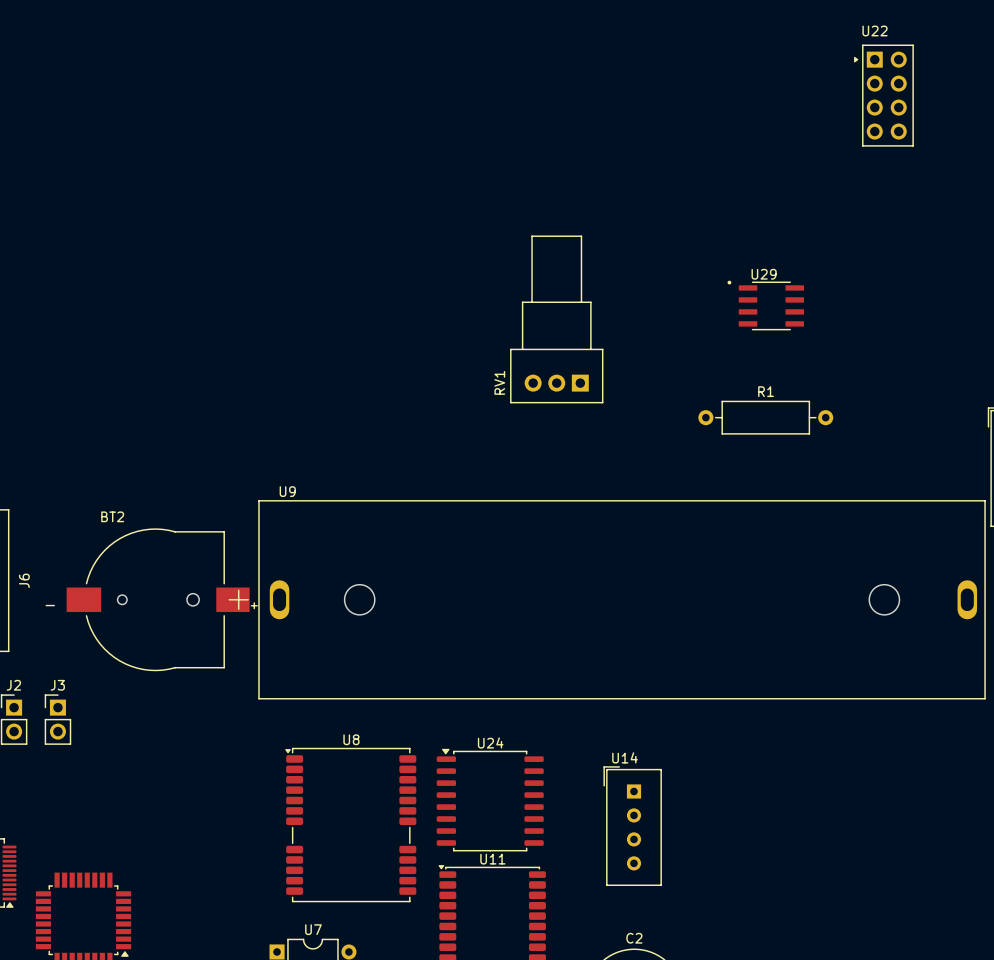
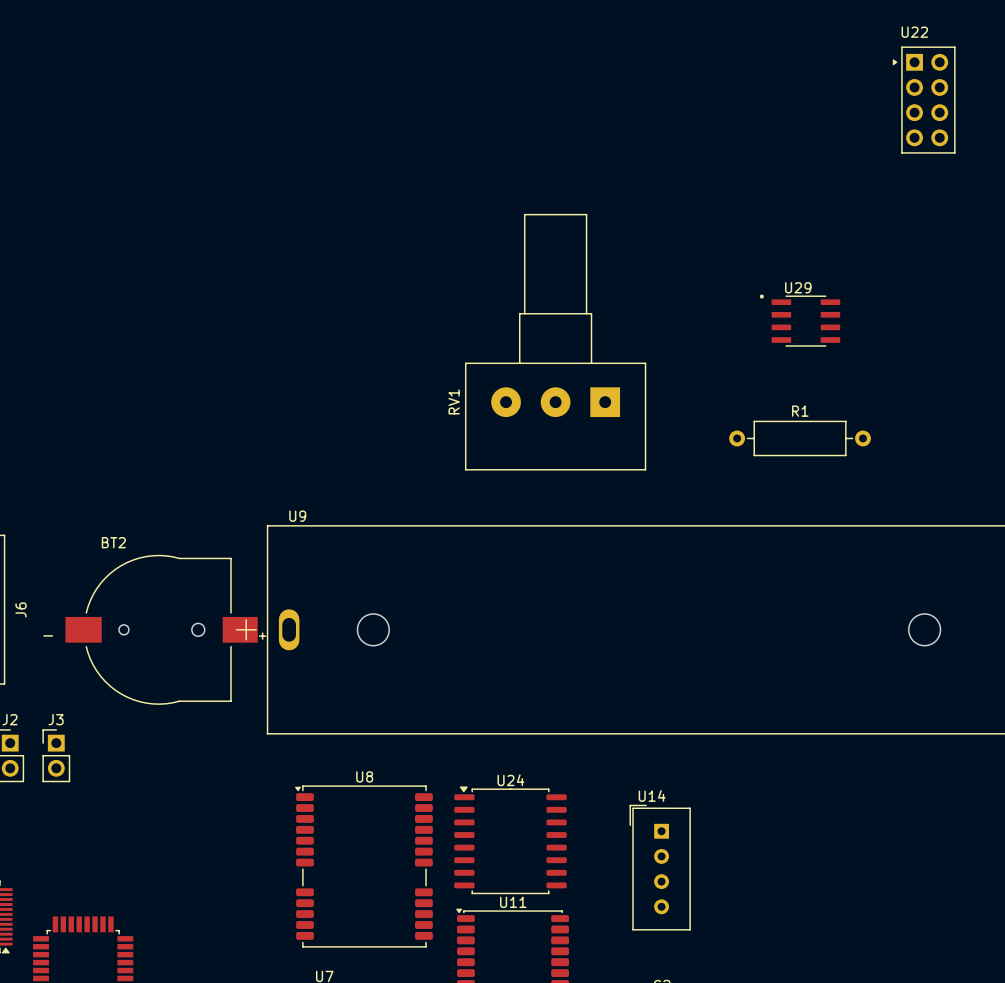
RV1 footprint: [510, 235, 604, 404] -> [465, 214, 647, 471]
RV1 name position: RV1 (499, 382) -> RV1 (454, 401)

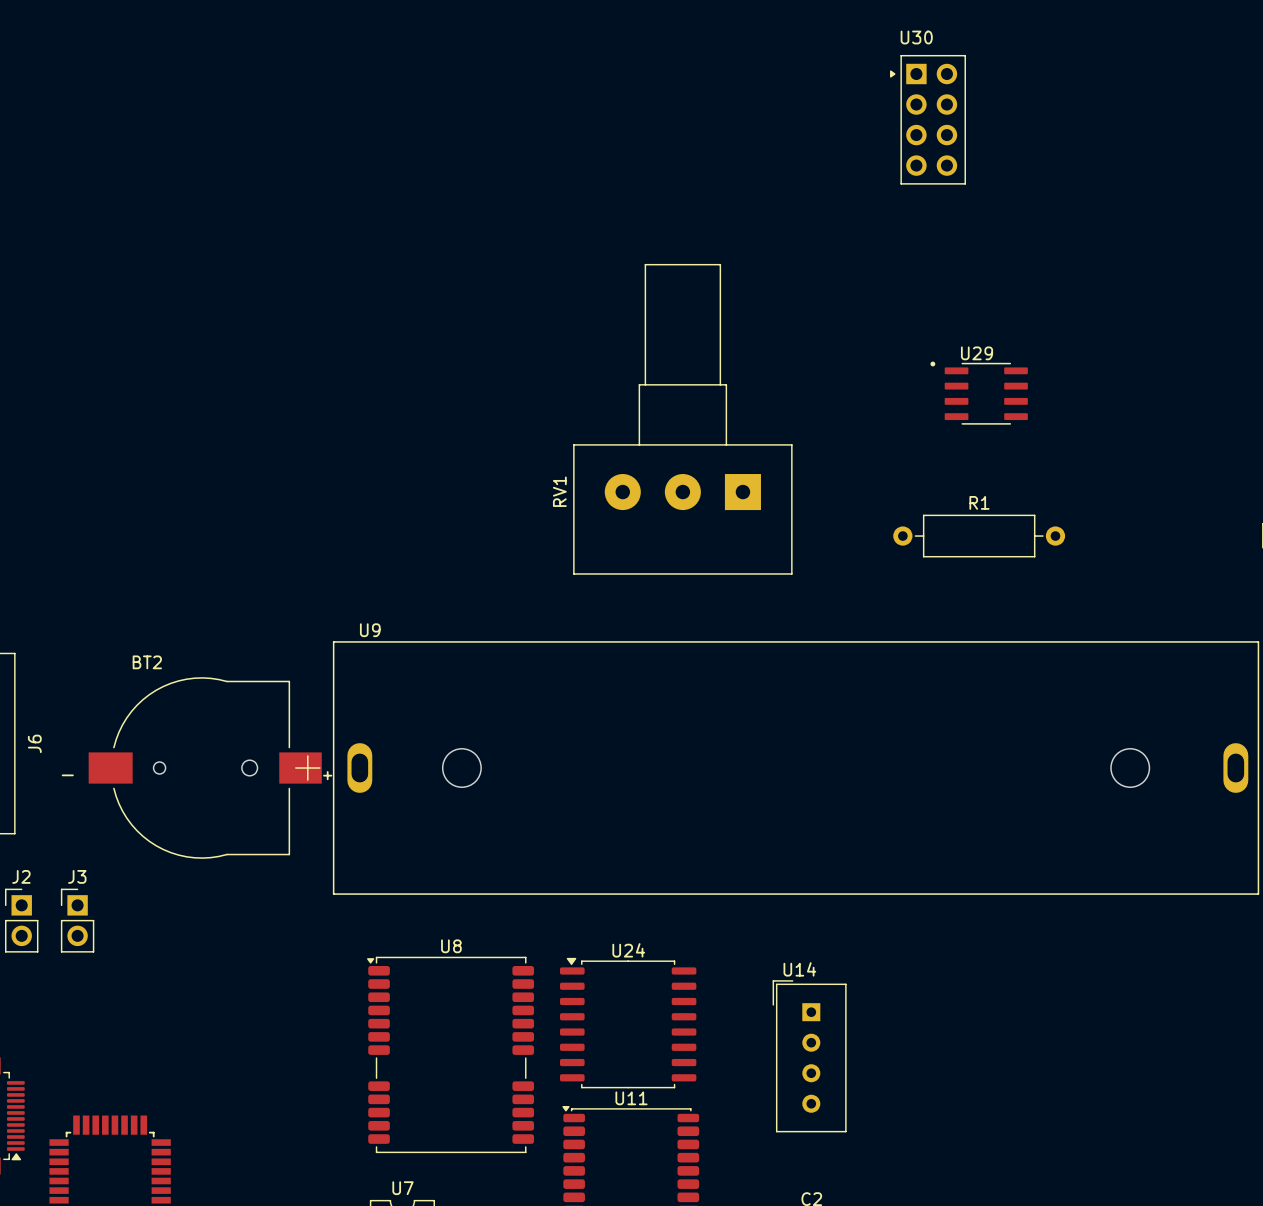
U30: none -> (928, 119)
U22: (924, 100) -> none

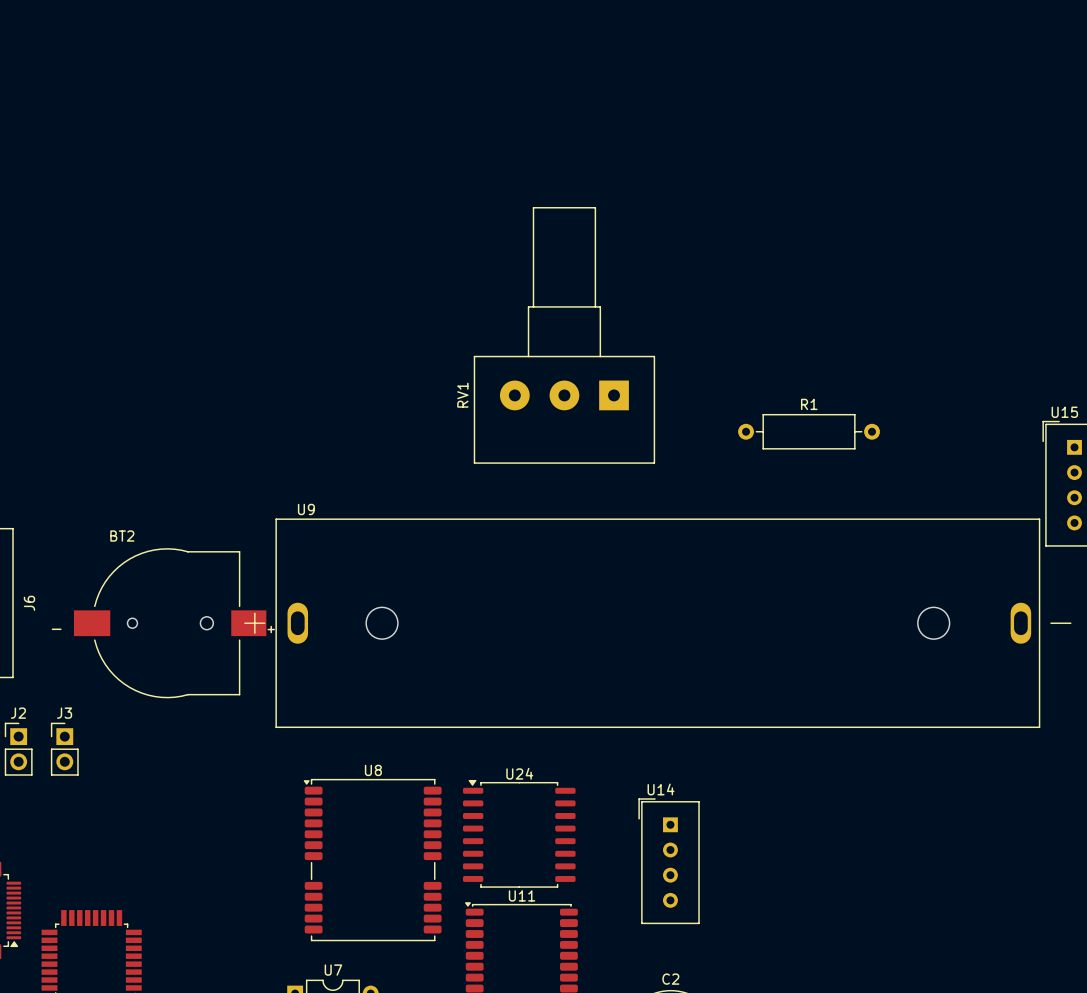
U30: (928, 119) -> none
U29: (979, 393) -> none

